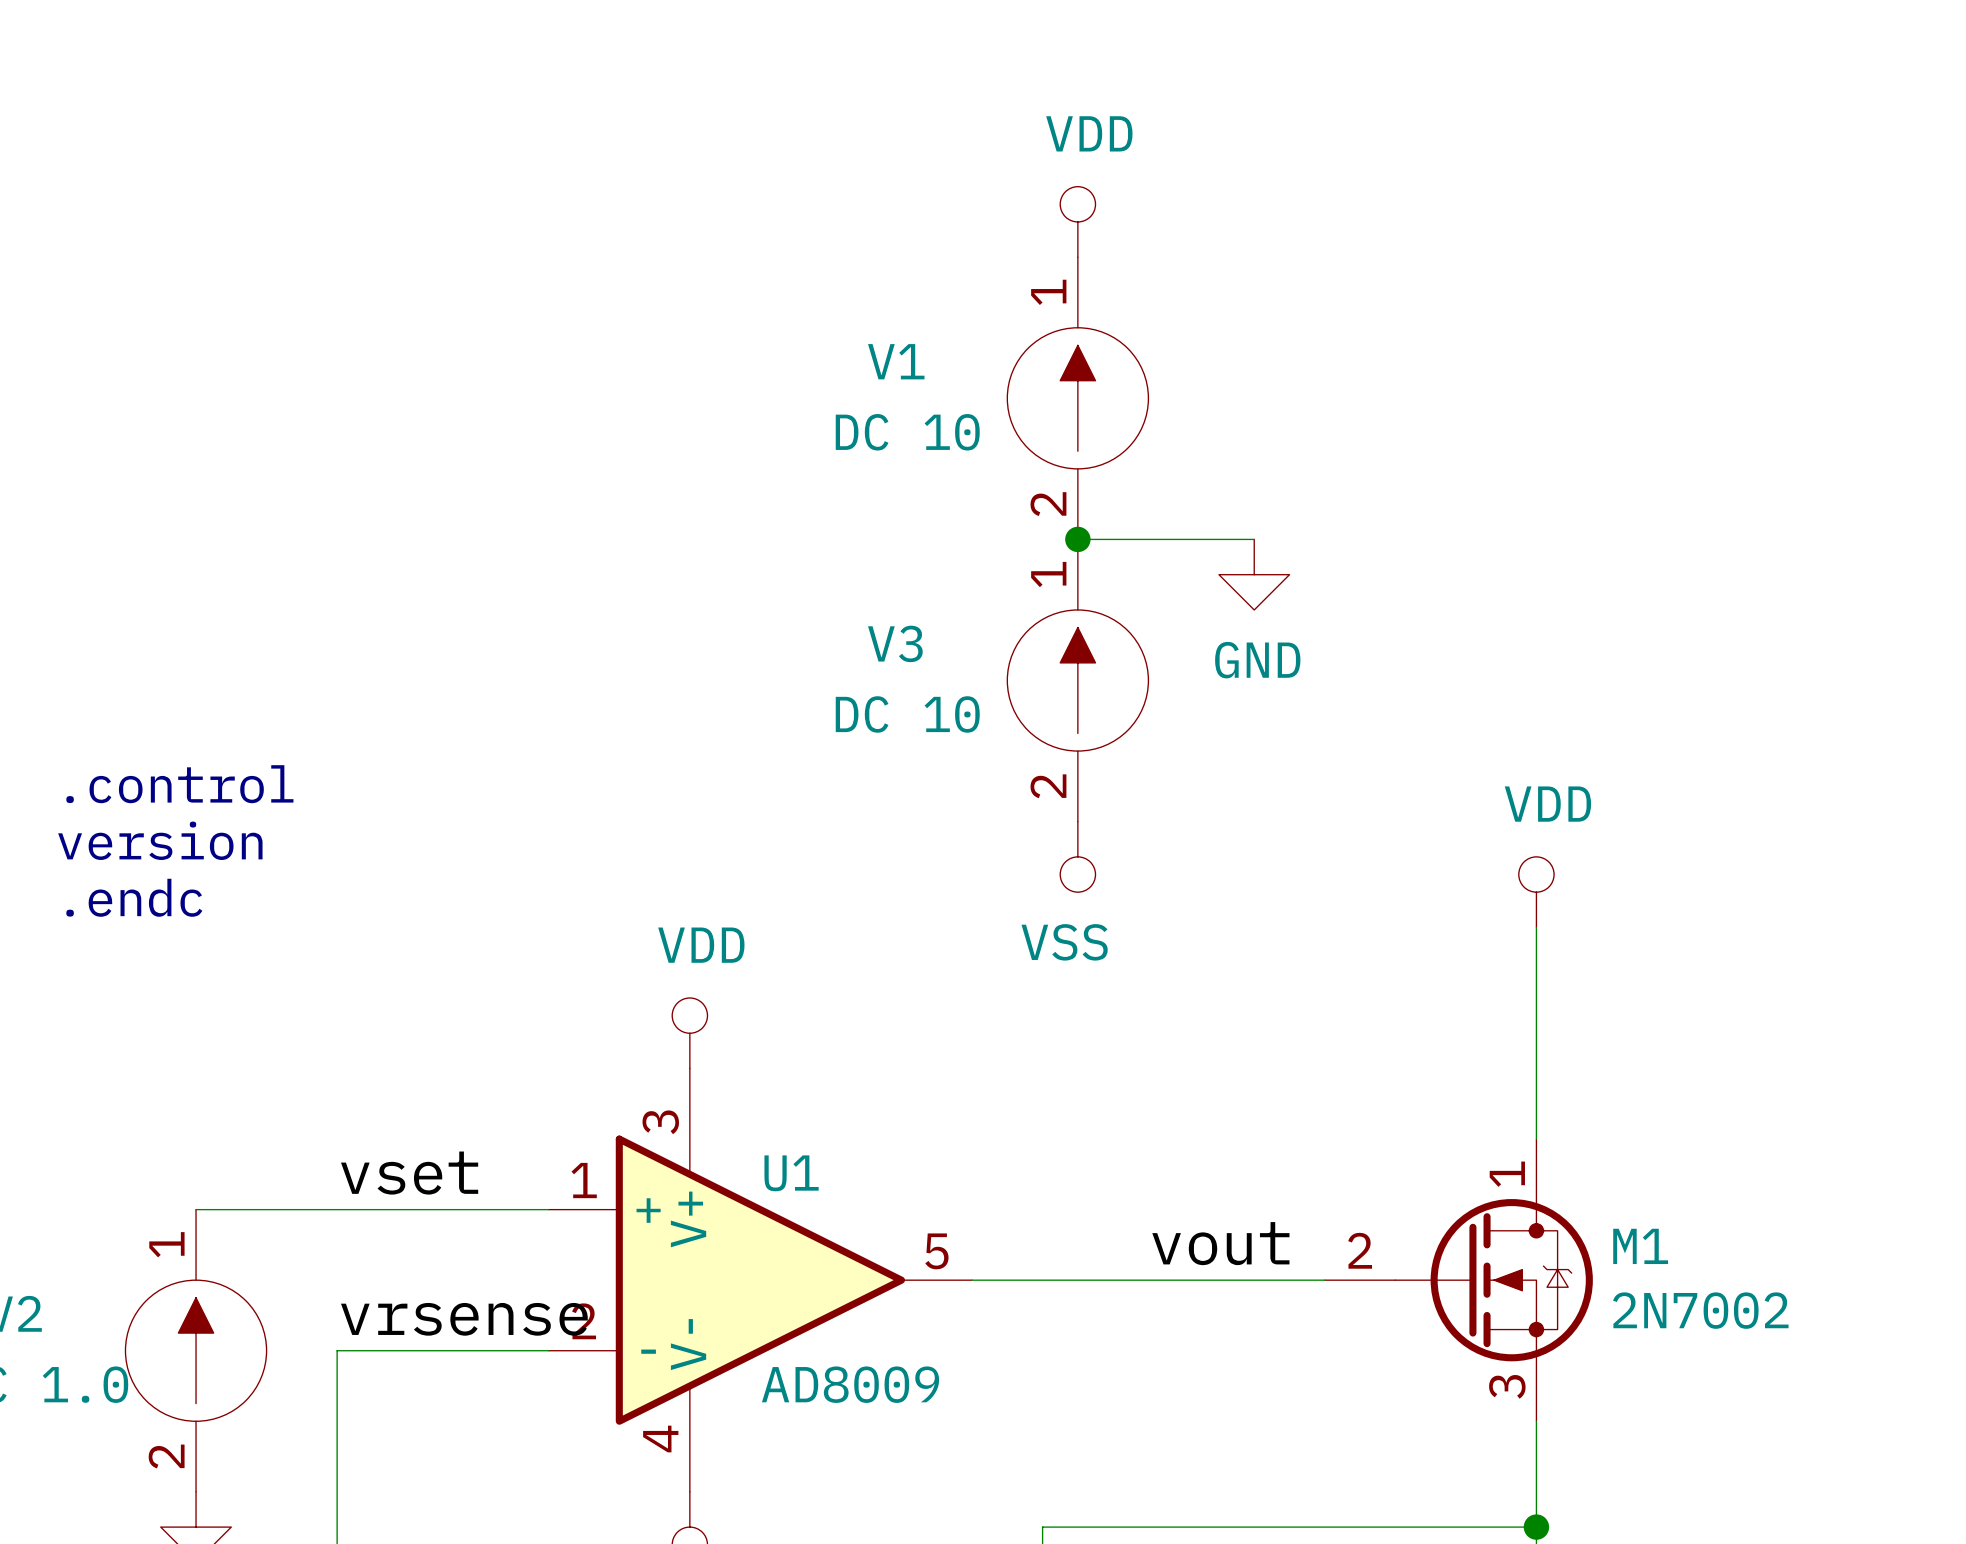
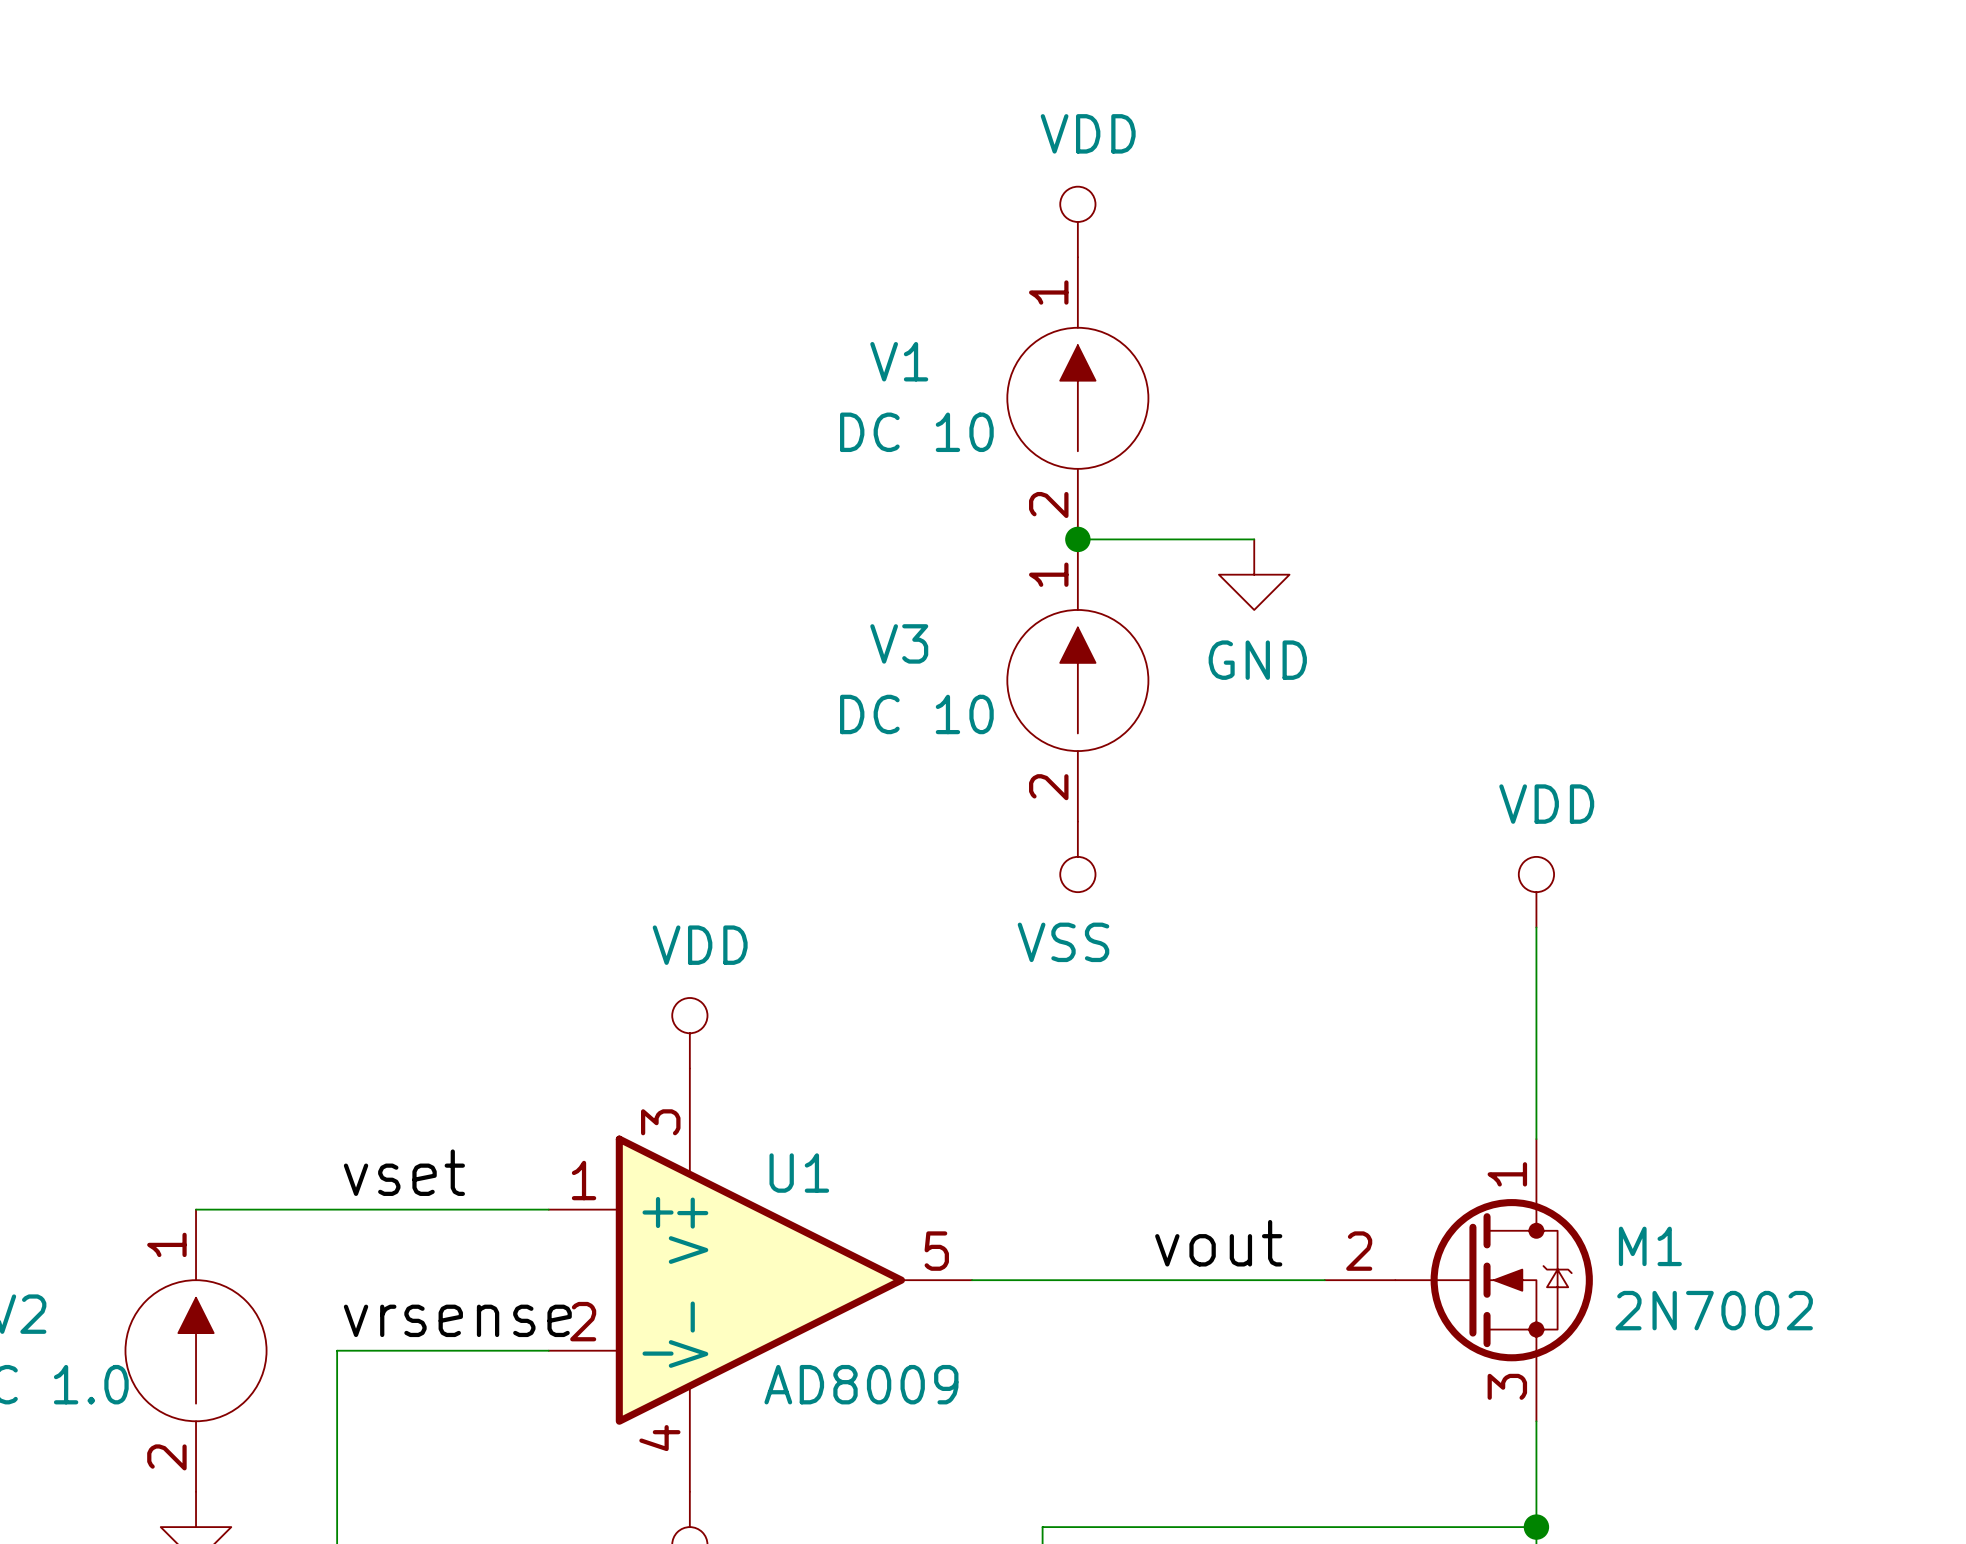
text: .control (179, 784) -> none
text: version (160, 840) -> none
text: .endc (134, 897) -> none

